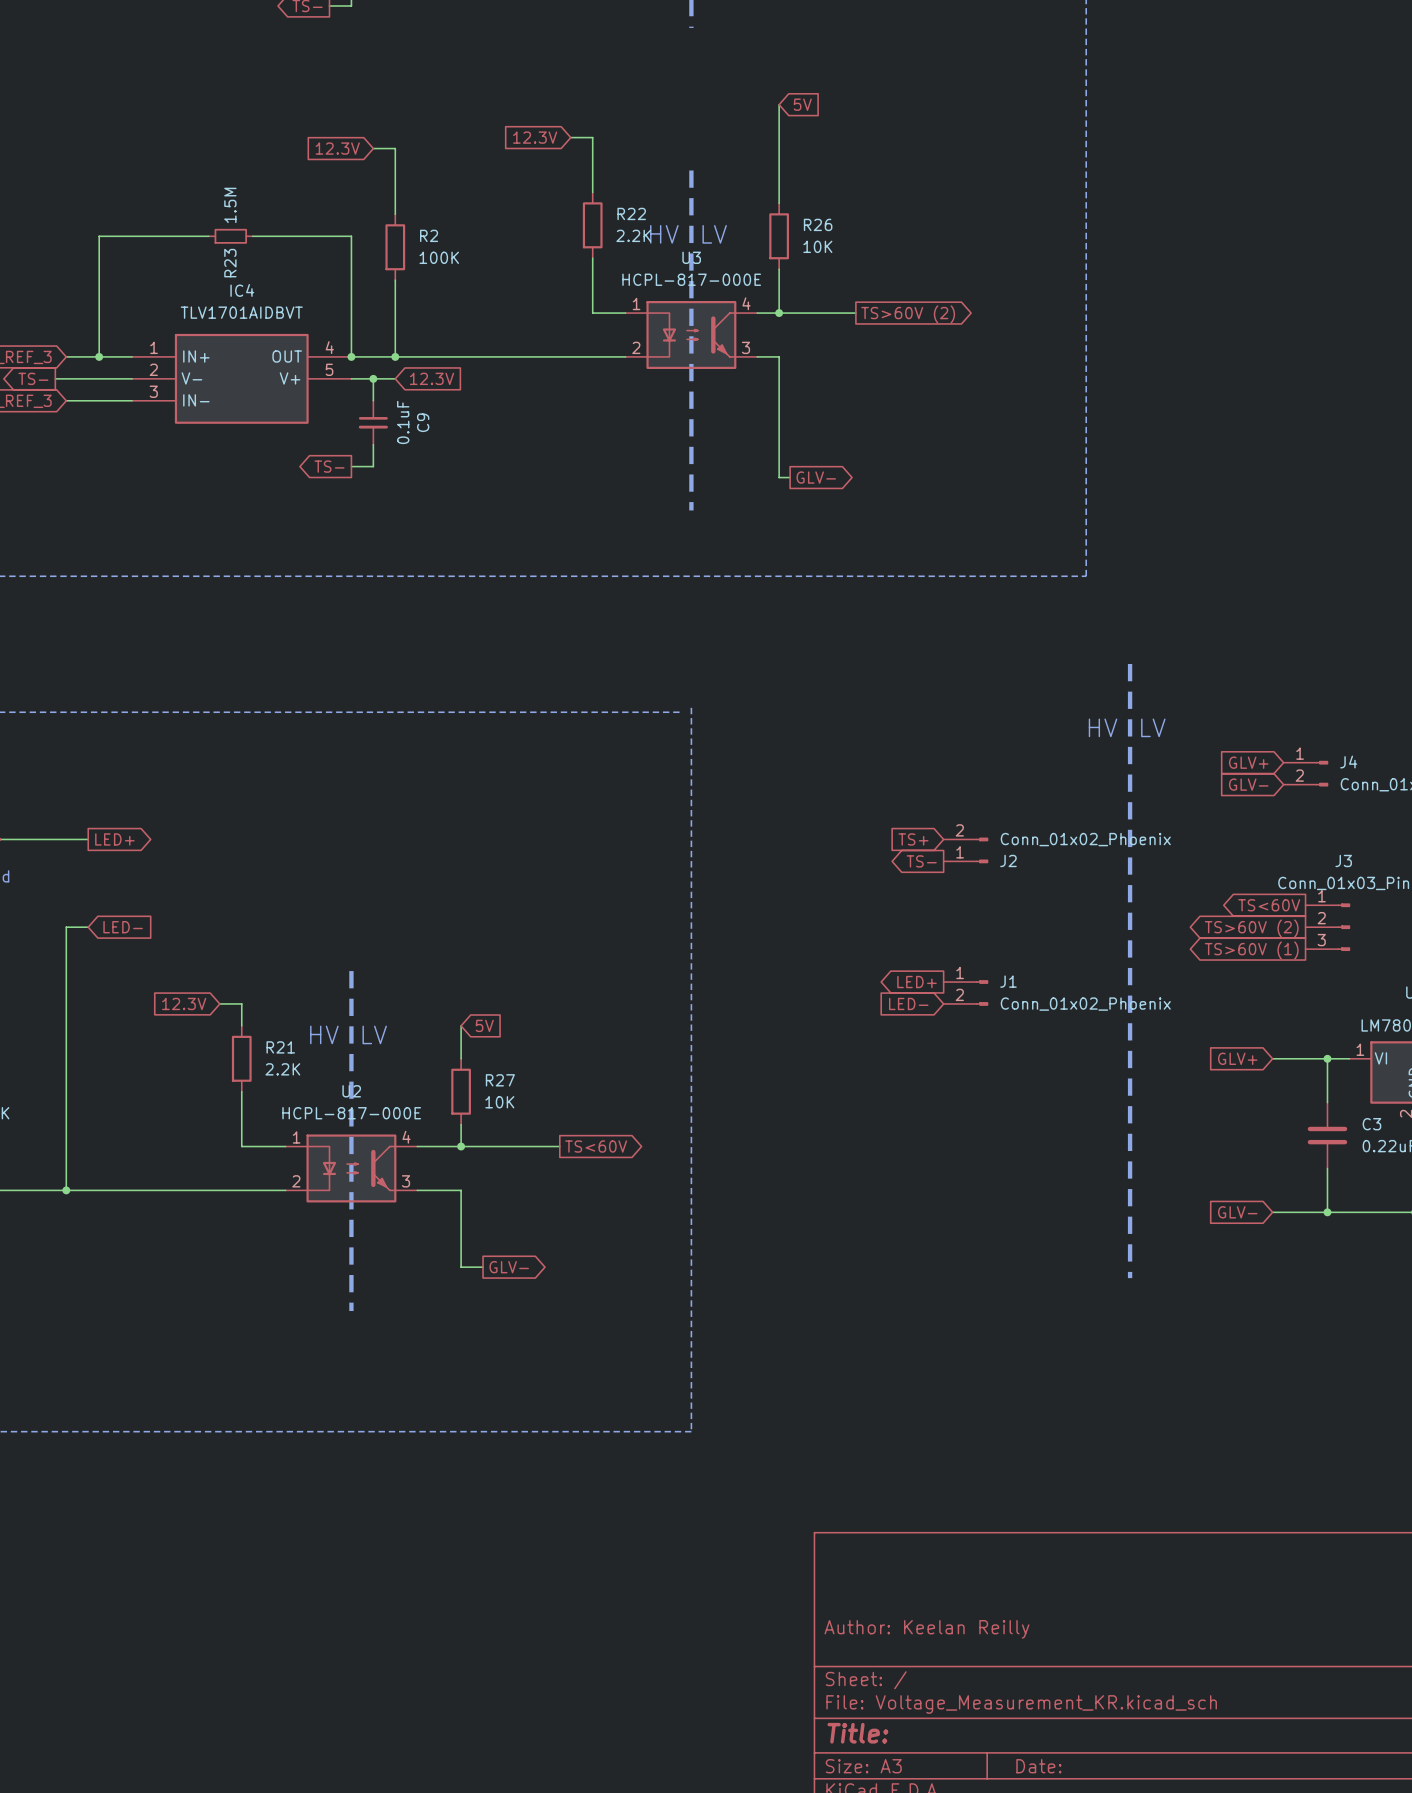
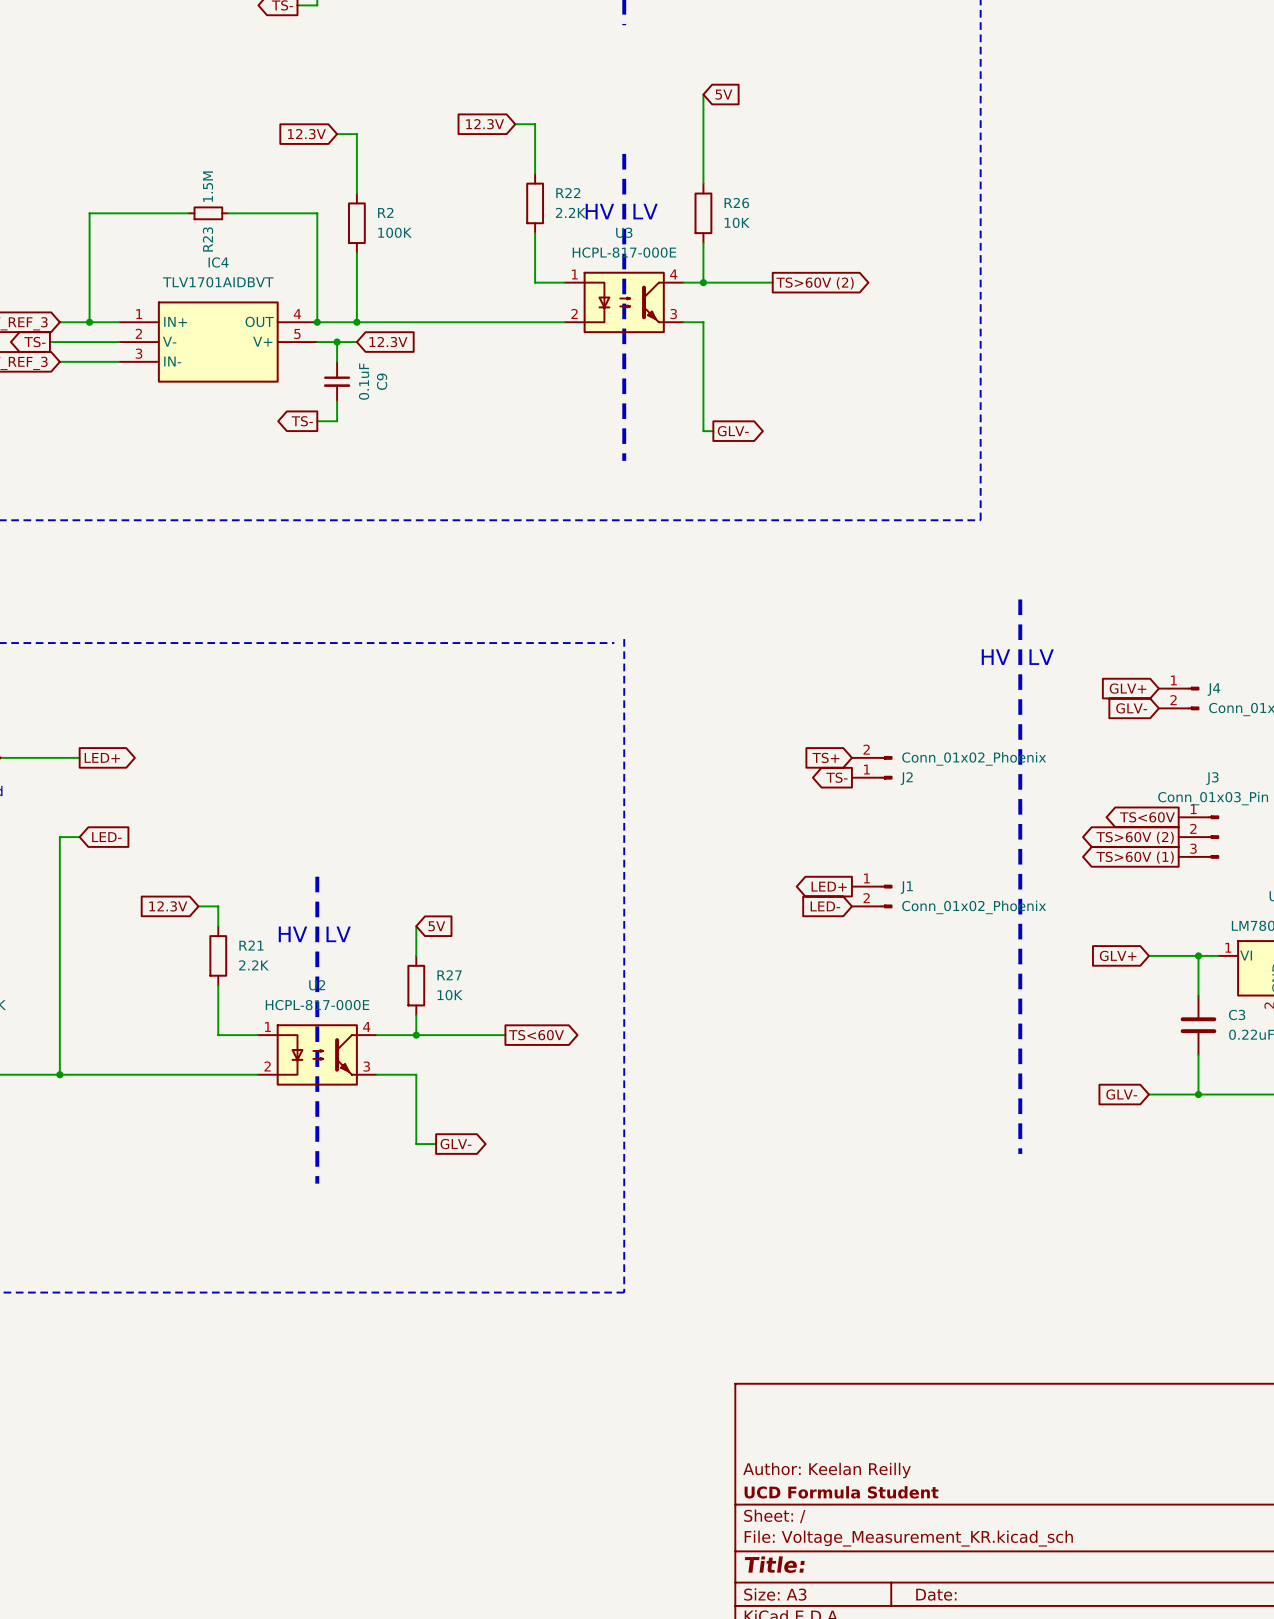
title block: none -> UCD Formula Student (841, 1492)

